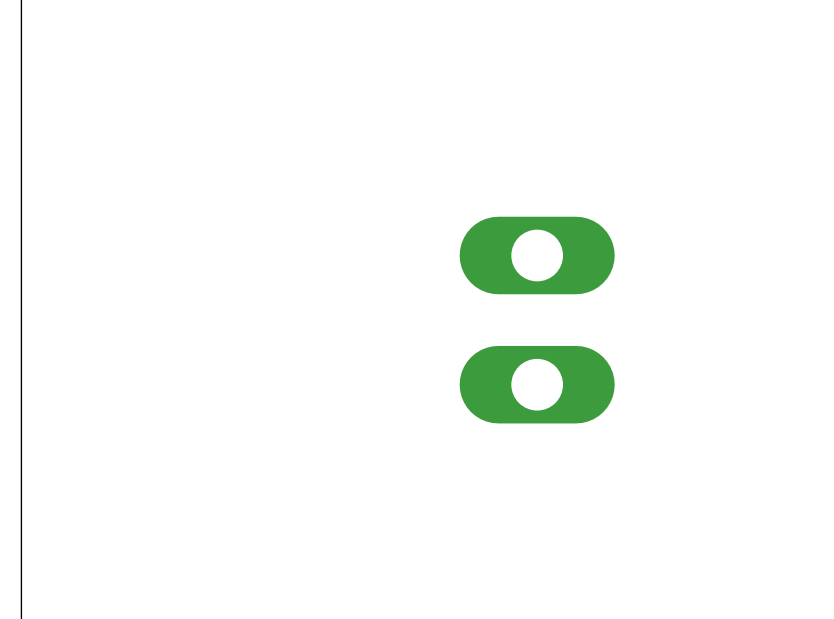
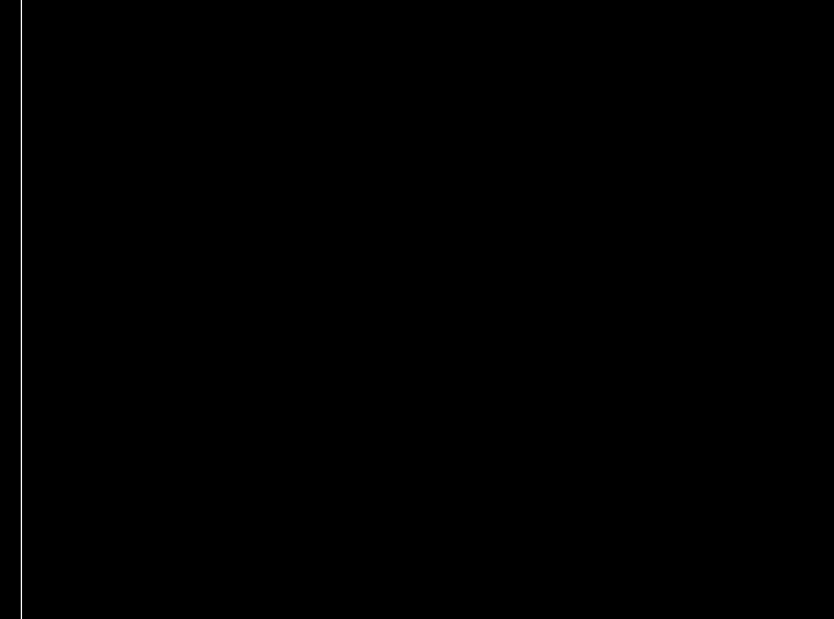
part: (537, 320) -> none

